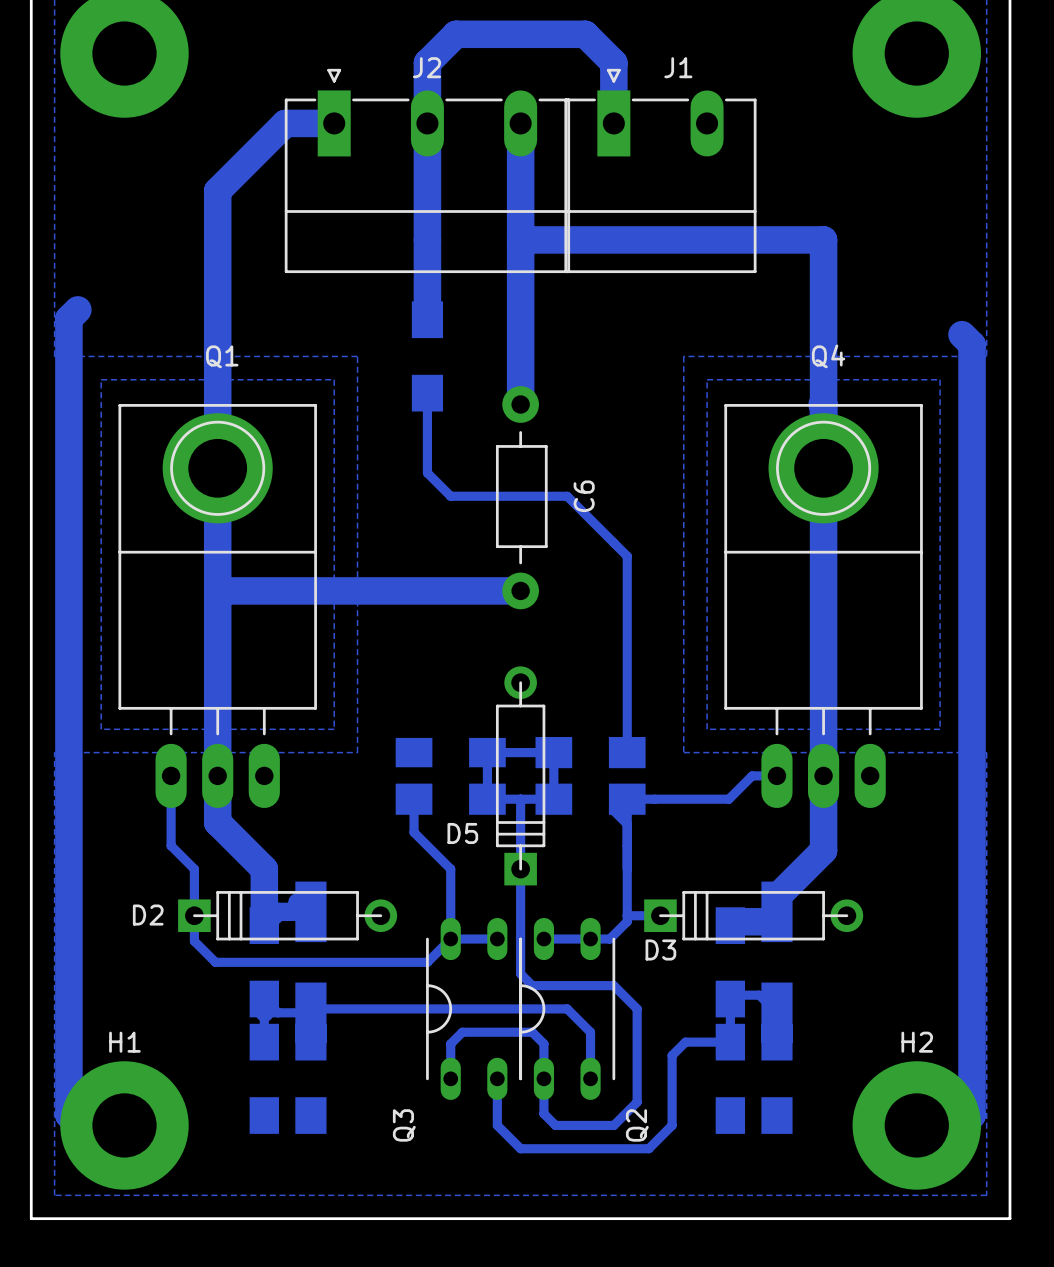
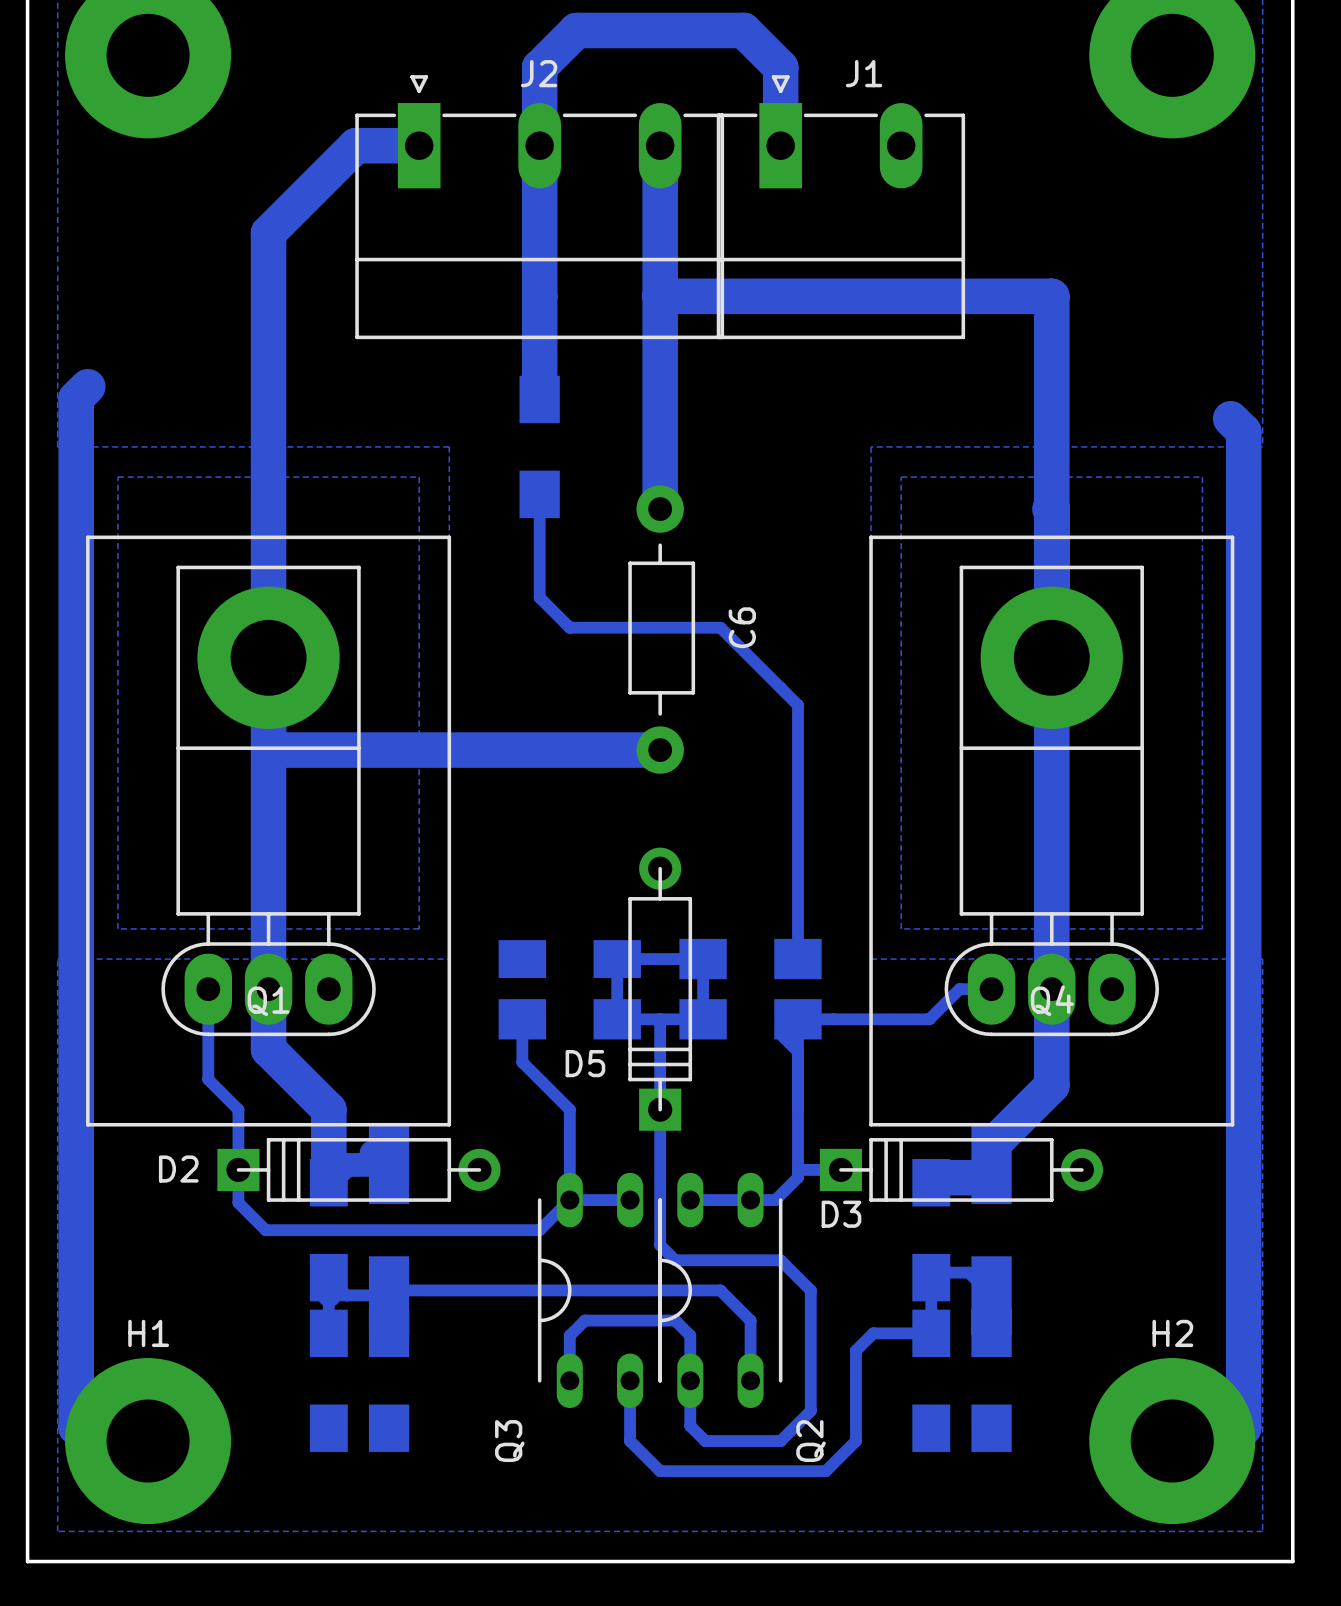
Q1 name position: Q1 (222, 356) -> Q1 (268, 1001)
Q4 name position: Q4 (828, 356) -> Q4 (1052, 1000)
Q1 footprint: [118, 404, 317, 809] -> [86, 535, 452, 1127]
Q4 footprint: [724, 404, 923, 809] -> [869, 535, 1235, 1127]

